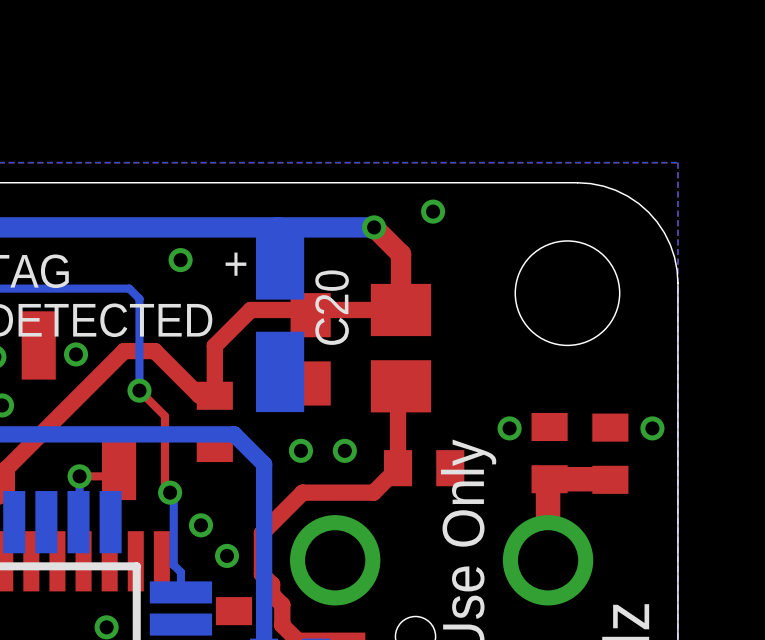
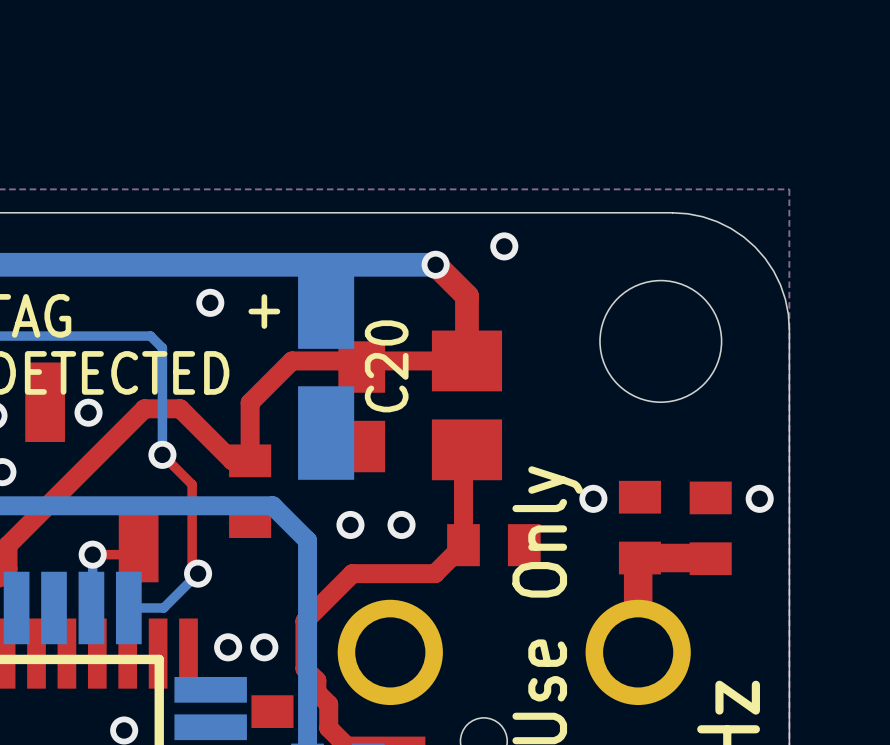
bottom track: (170, 492) (173, 496) (173, 565) (180, 572) (180, 592) -> (198, 573) (163, 607) (128, 607)
via position: (201, 525) -> (228, 647)

